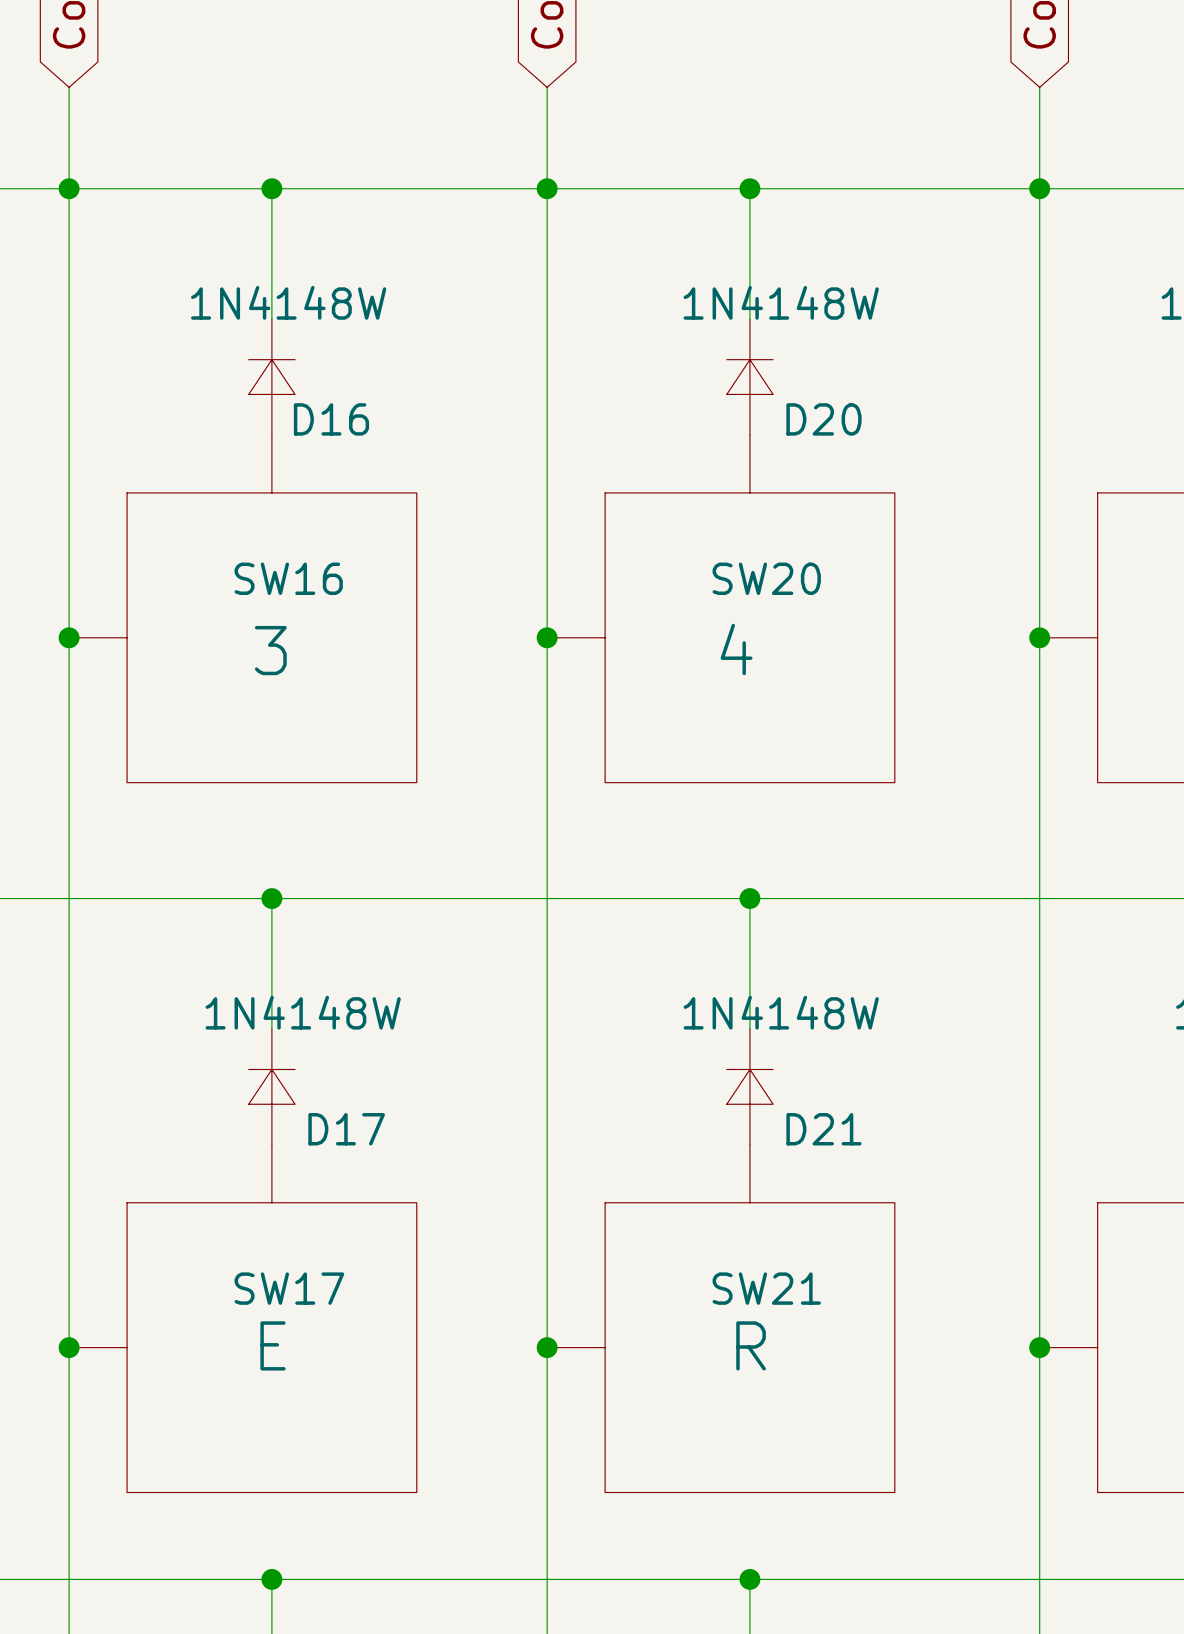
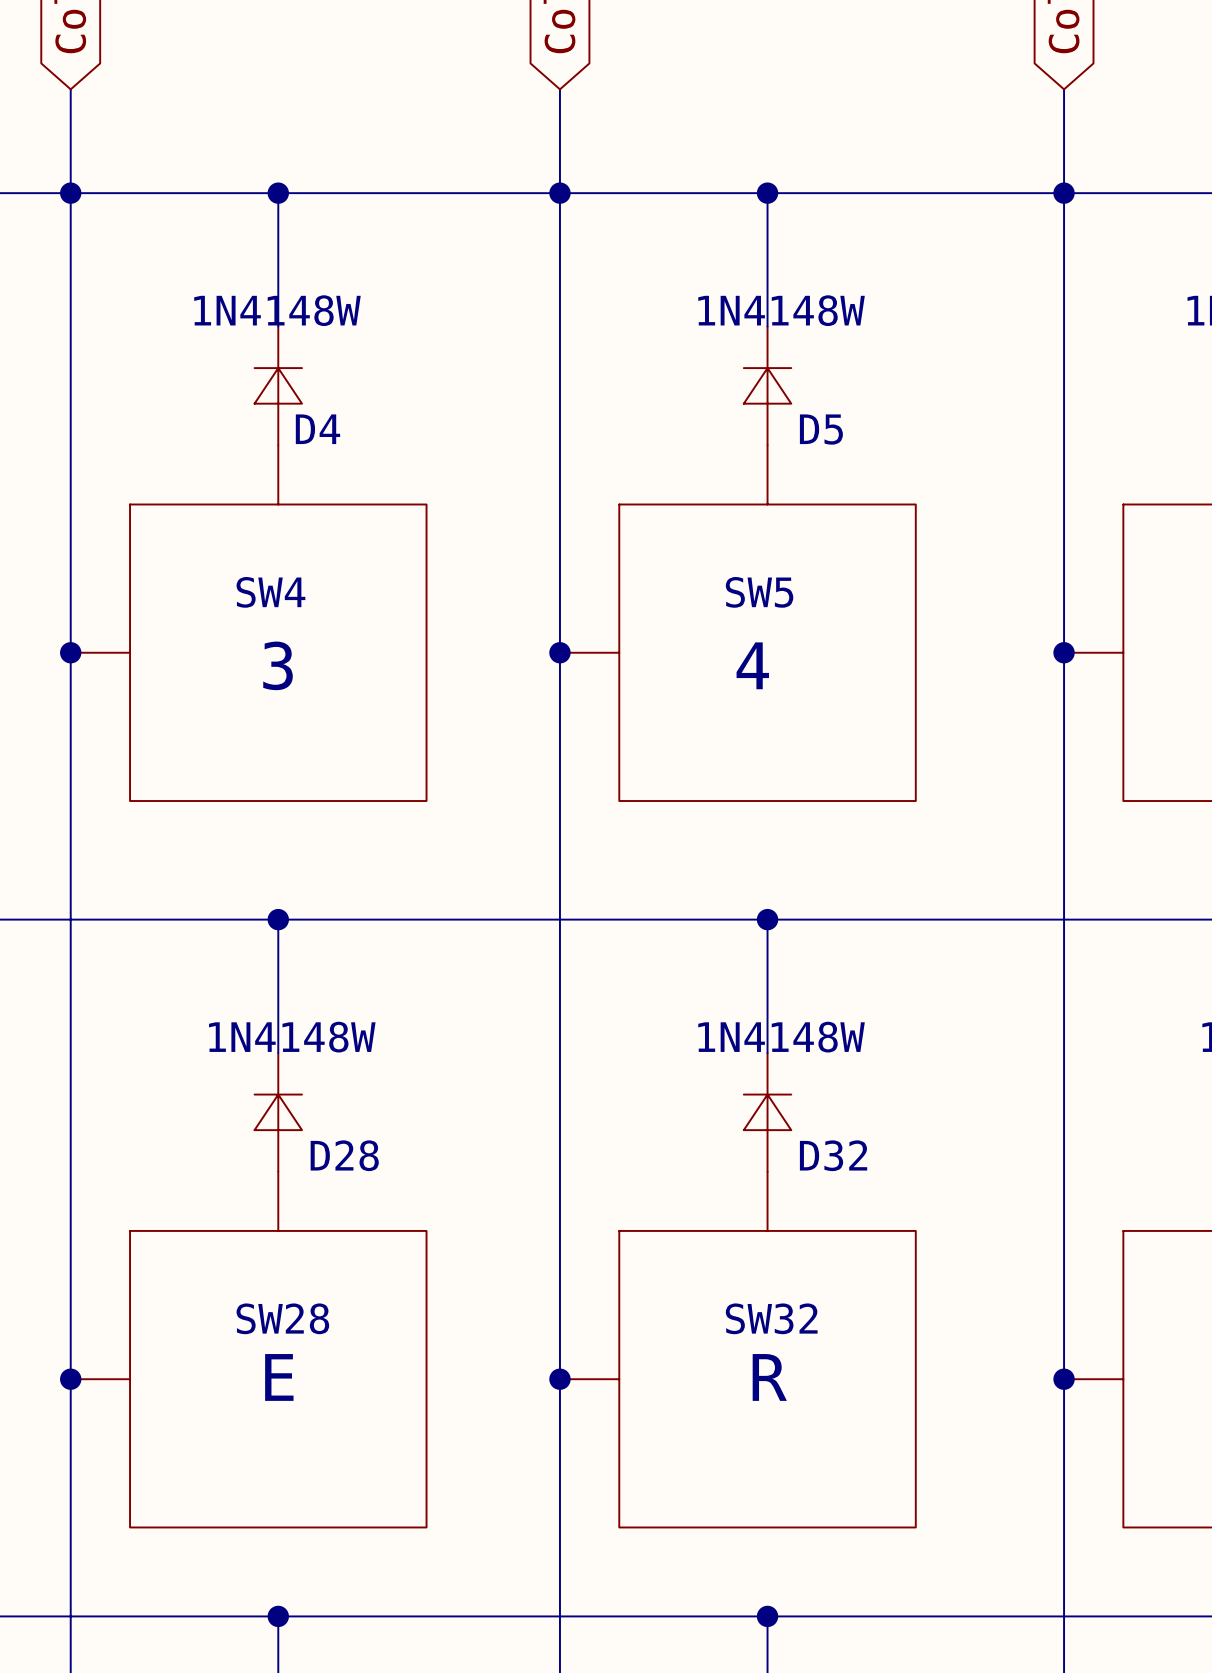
D16 name: D16 (331, 419) -> D4 (317, 429)
D20 name: D20 (823, 419) -> D5 (821, 429)
SW16 name: SW16 (288, 578) -> SW4 (270, 592)
SW20 name: SW20 (766, 578) -> SW5 (759, 592)
D17 name: D17 (346, 1129) -> D28 (344, 1155)
D21 name: D21 (823, 1129) -> D32 (833, 1155)
SW17 name: SW17 (289, 1288) -> SW28 (282, 1318)
SW21 name: SW21 (766, 1288) -> SW32 (771, 1318)

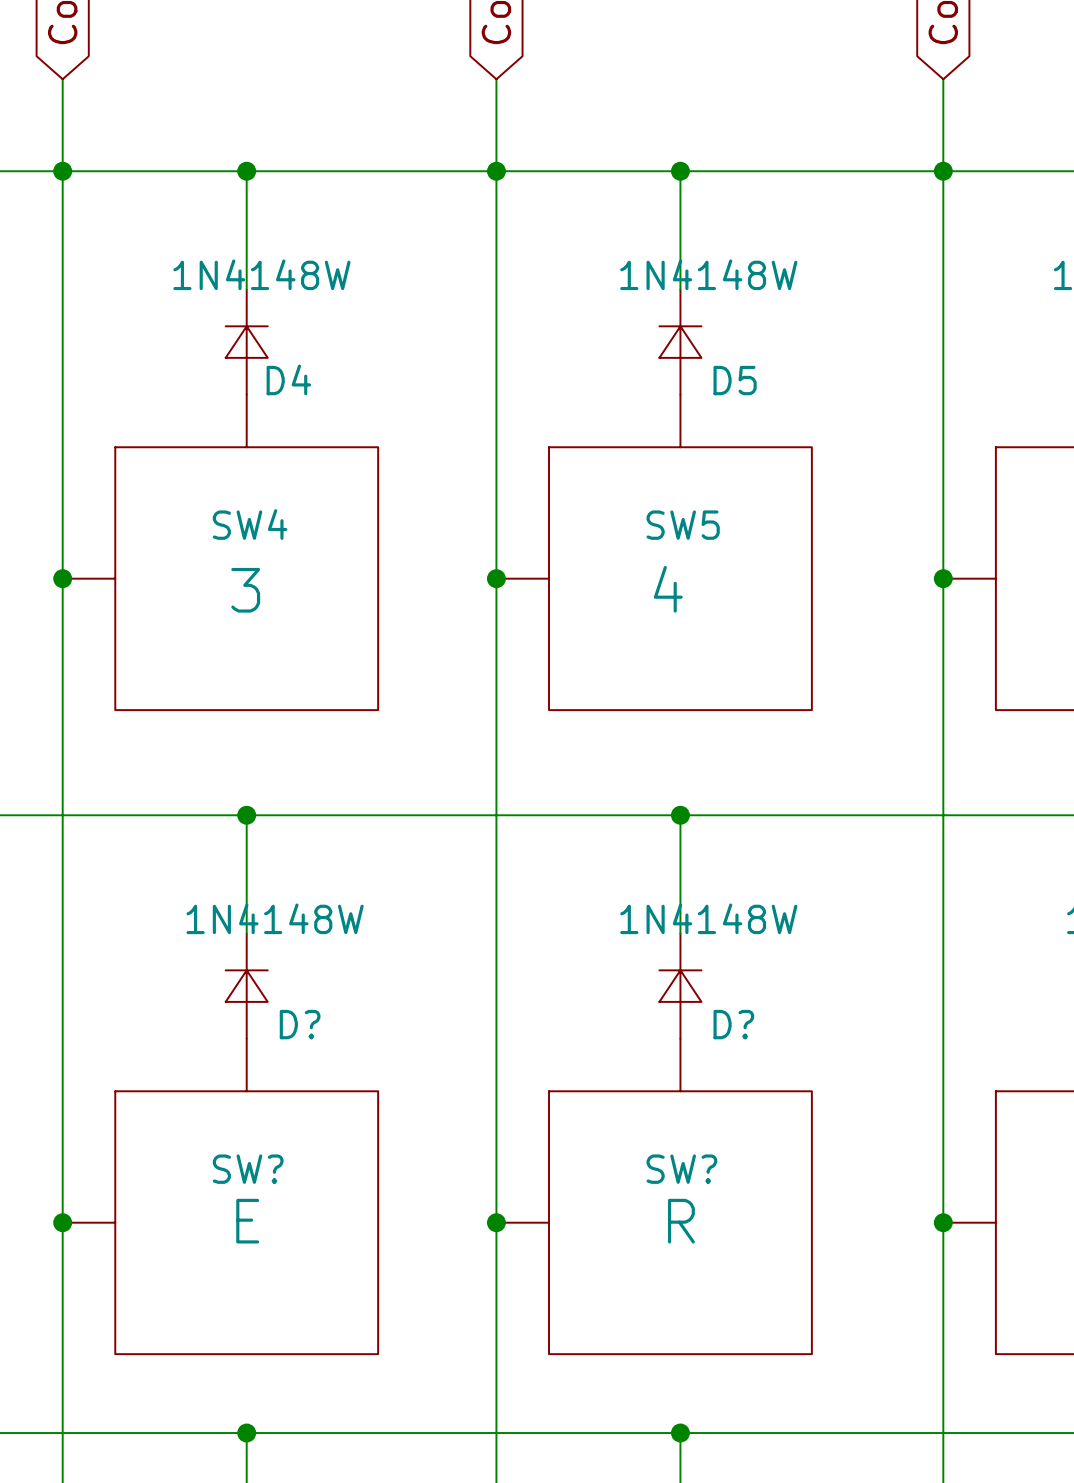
D28 name: D28 (344, 1155) -> D? (300, 1024)
D32 name: D32 (833, 1155) -> D? (733, 1024)
SW28 name: SW28 (282, 1318) -> SW? (248, 1169)
SW32 name: SW32 (771, 1318) -> SW? (681, 1169)

